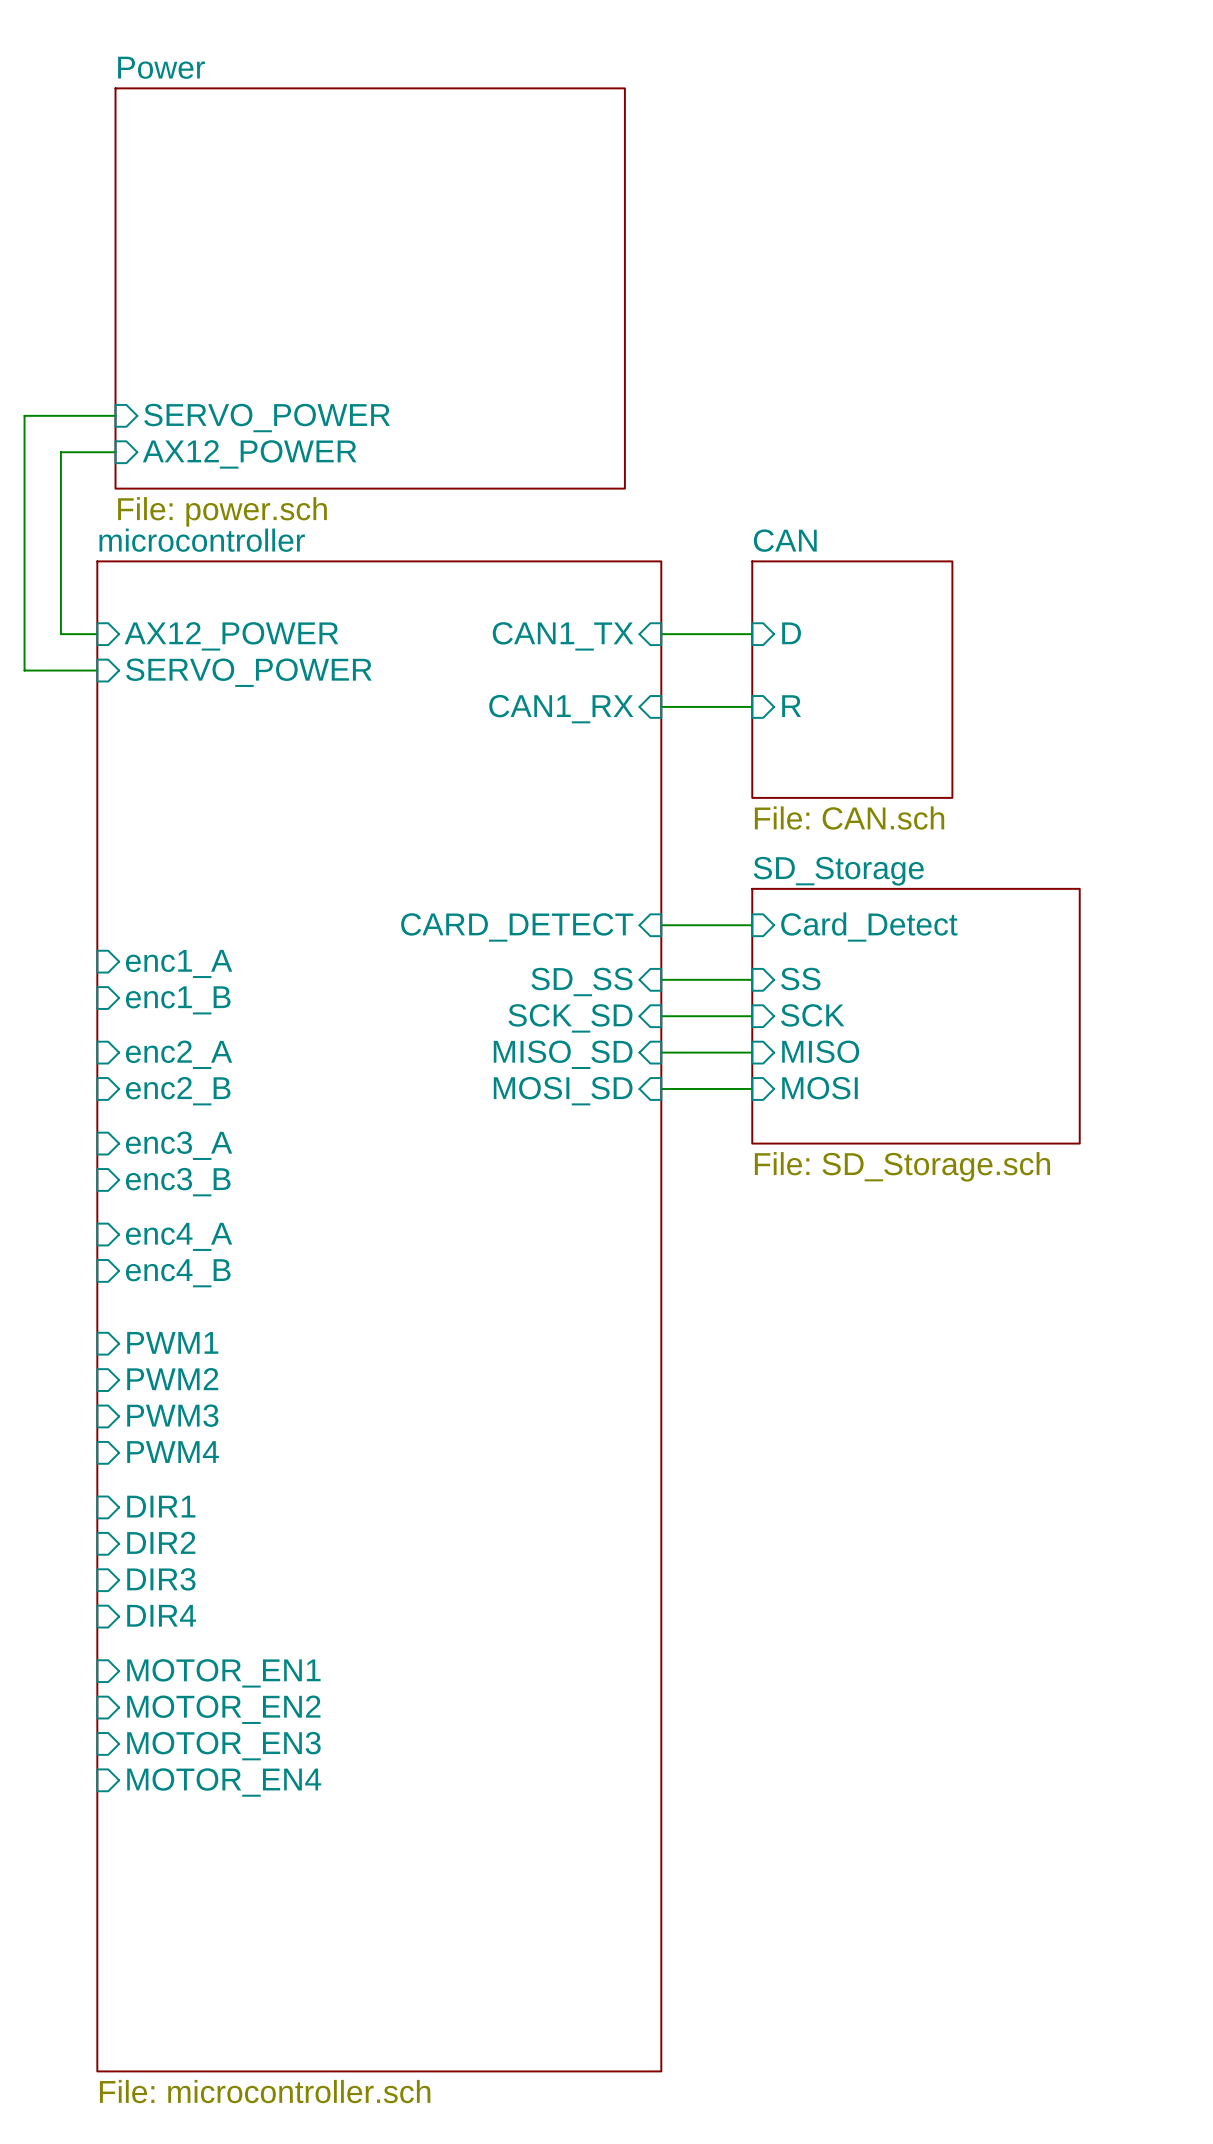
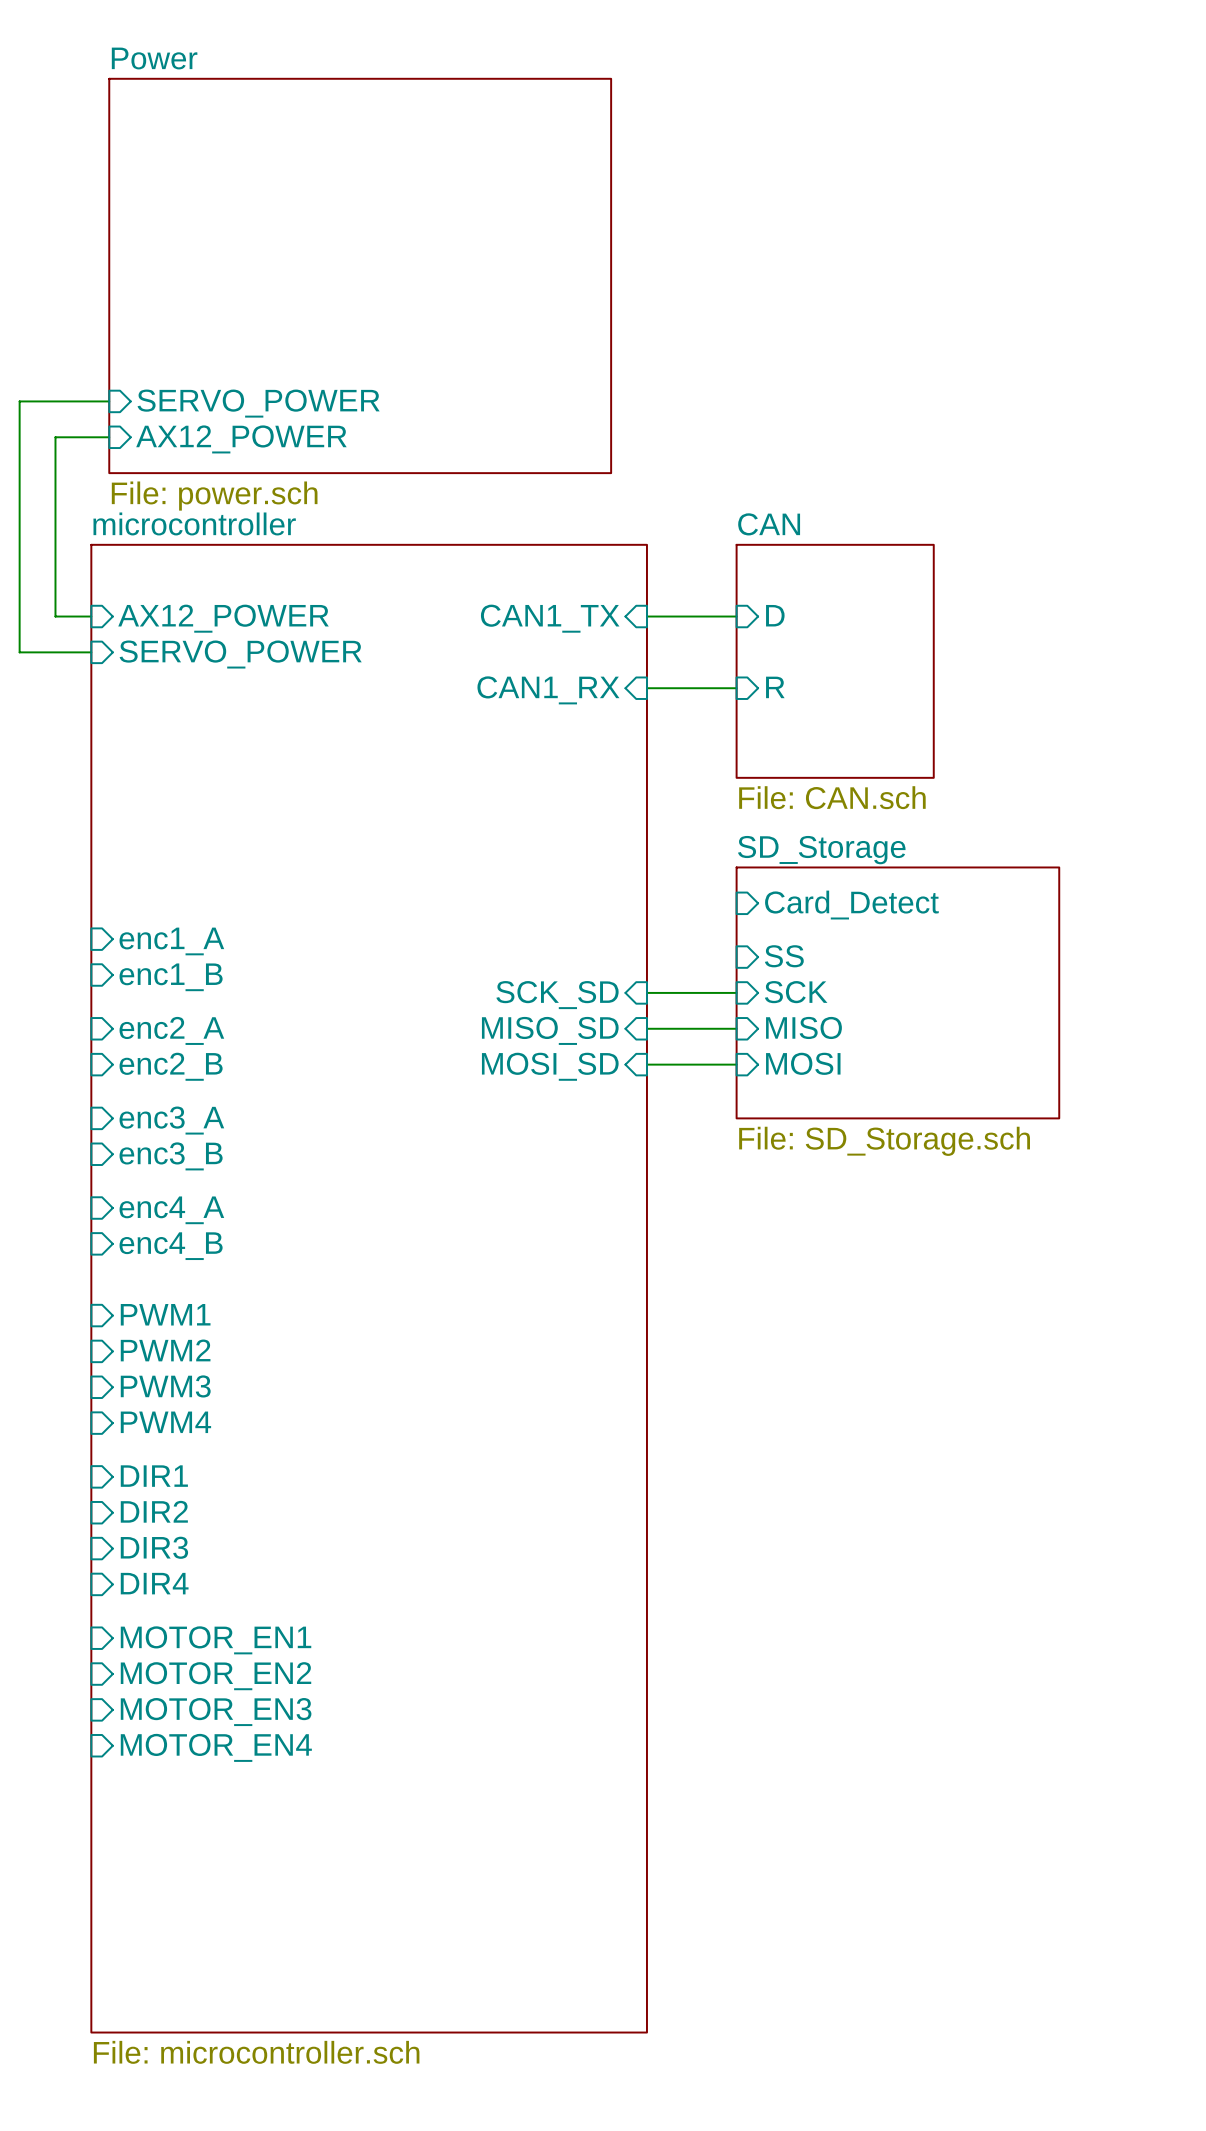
wire: (661, 925) (752, 925) -> none
sheet pin: CARD_DETECT (517, 927) -> none
wire: (661, 979) (752, 979) -> none
sheet pin: SD_SS (581, 982) -> none

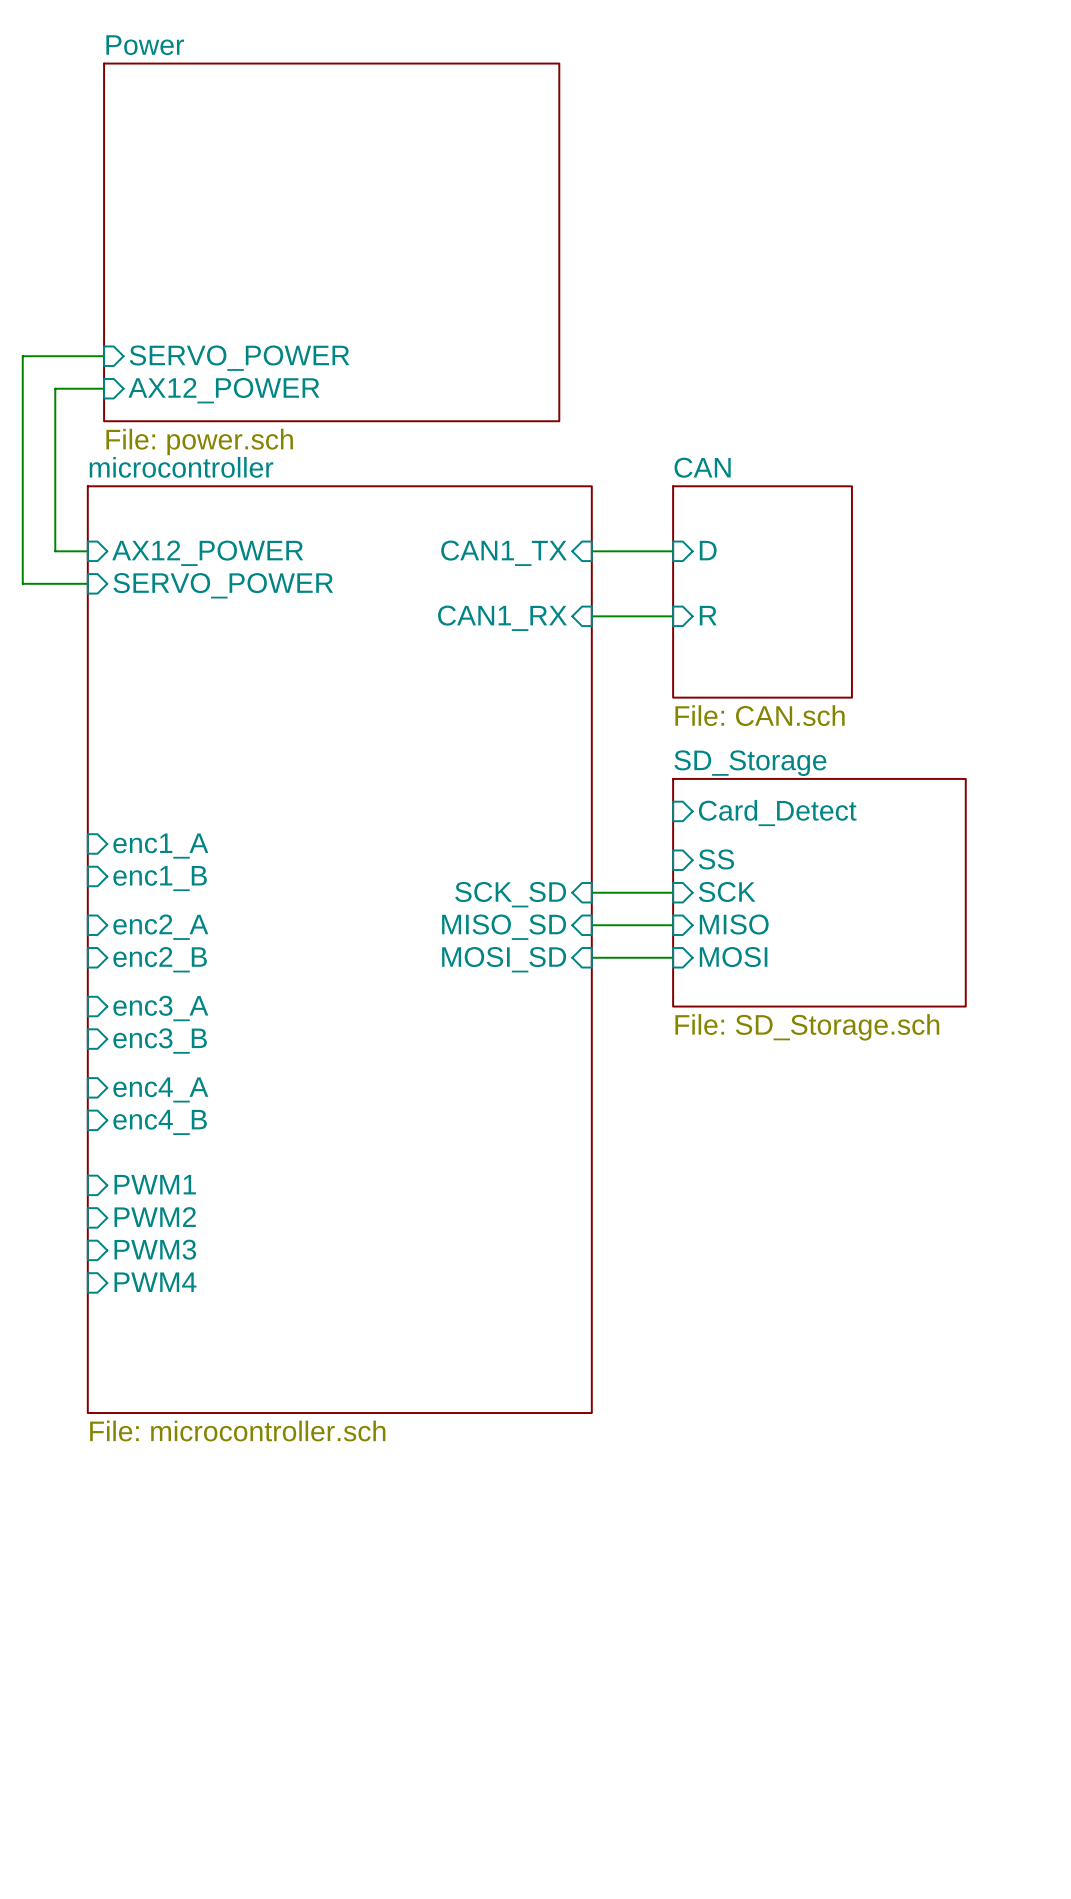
sheet microcontroller: none -> File: microcontroller.sch (339, 949)
sheet microcontroller: File: microcontroller.sch (369, 1288) -> none
sheet pin: DIR1 (154, 1476) -> none
sheet pin: DIR2 (154, 1511) -> none
sheet pin: DIR3 (154, 1547) -> none
sheet pin: DIR4 (154, 1583) -> none
sheet pin: MOTOR_EN1 (216, 1640) -> none
sheet pin: MOTOR_EN2 (216, 1676) -> none
sheet pin: MOTOR_EN3 (216, 1712) -> none
sheet pin: MOTOR_EN4 (216, 1747) -> none

